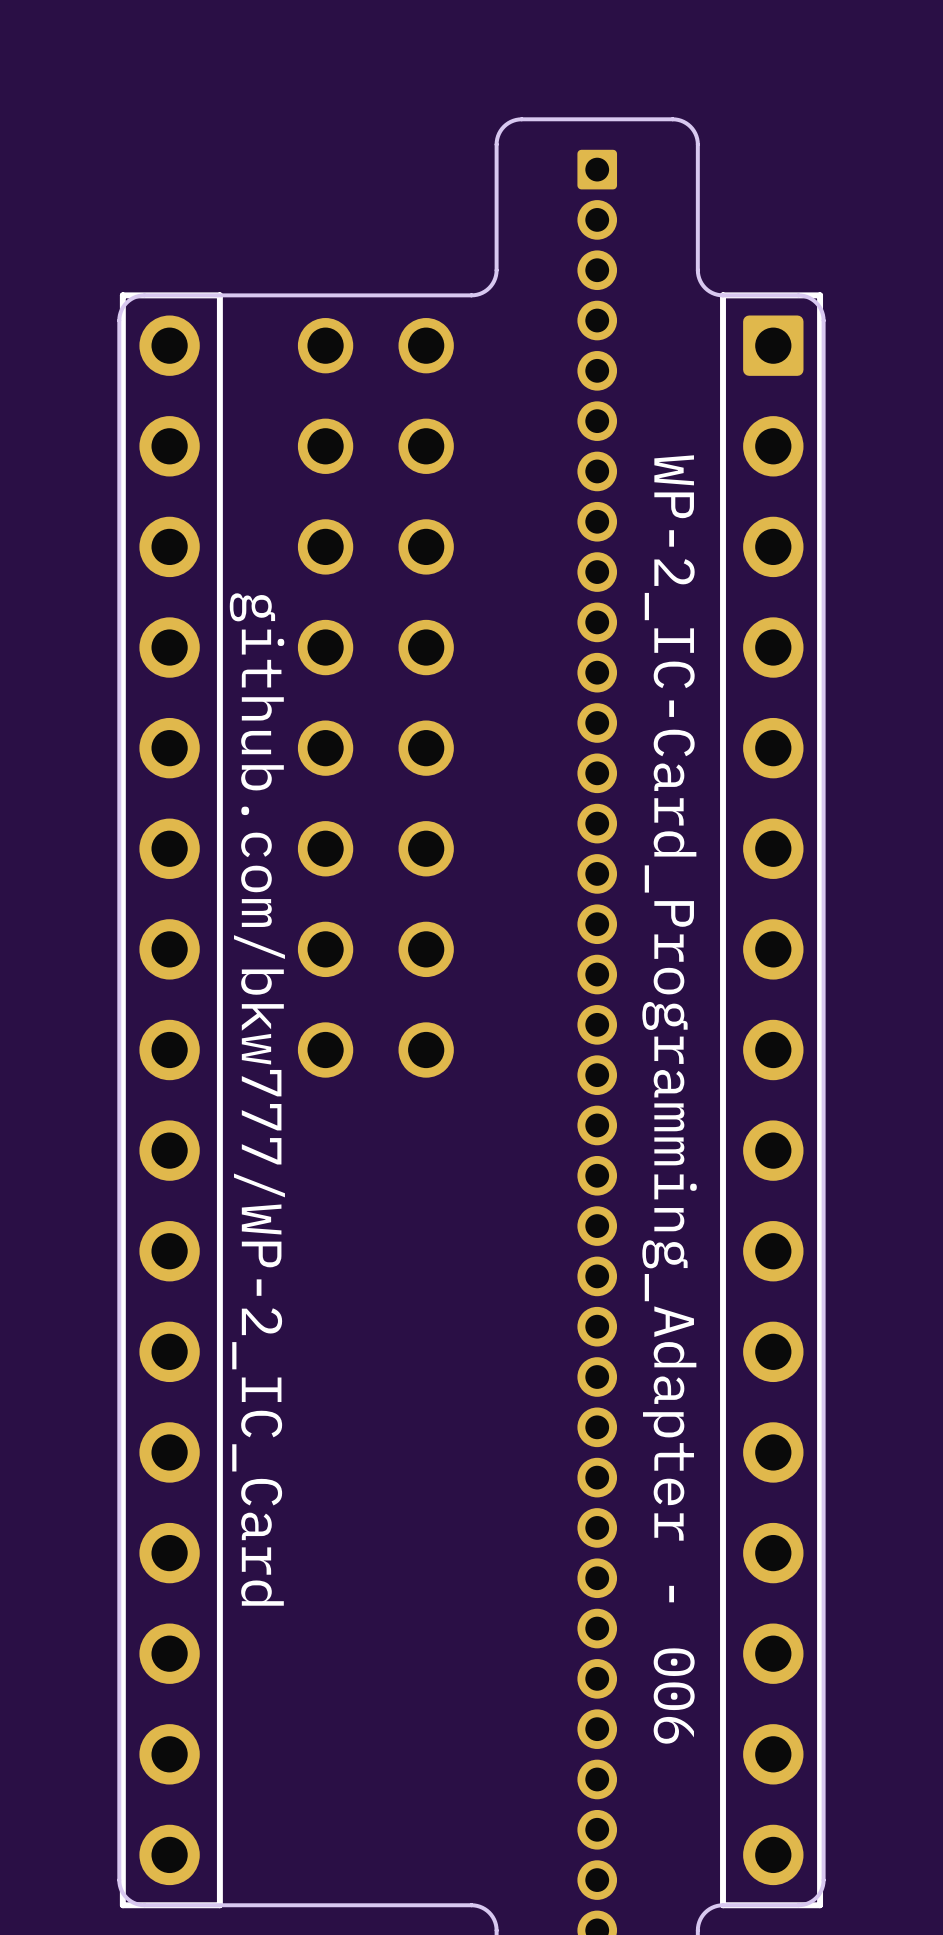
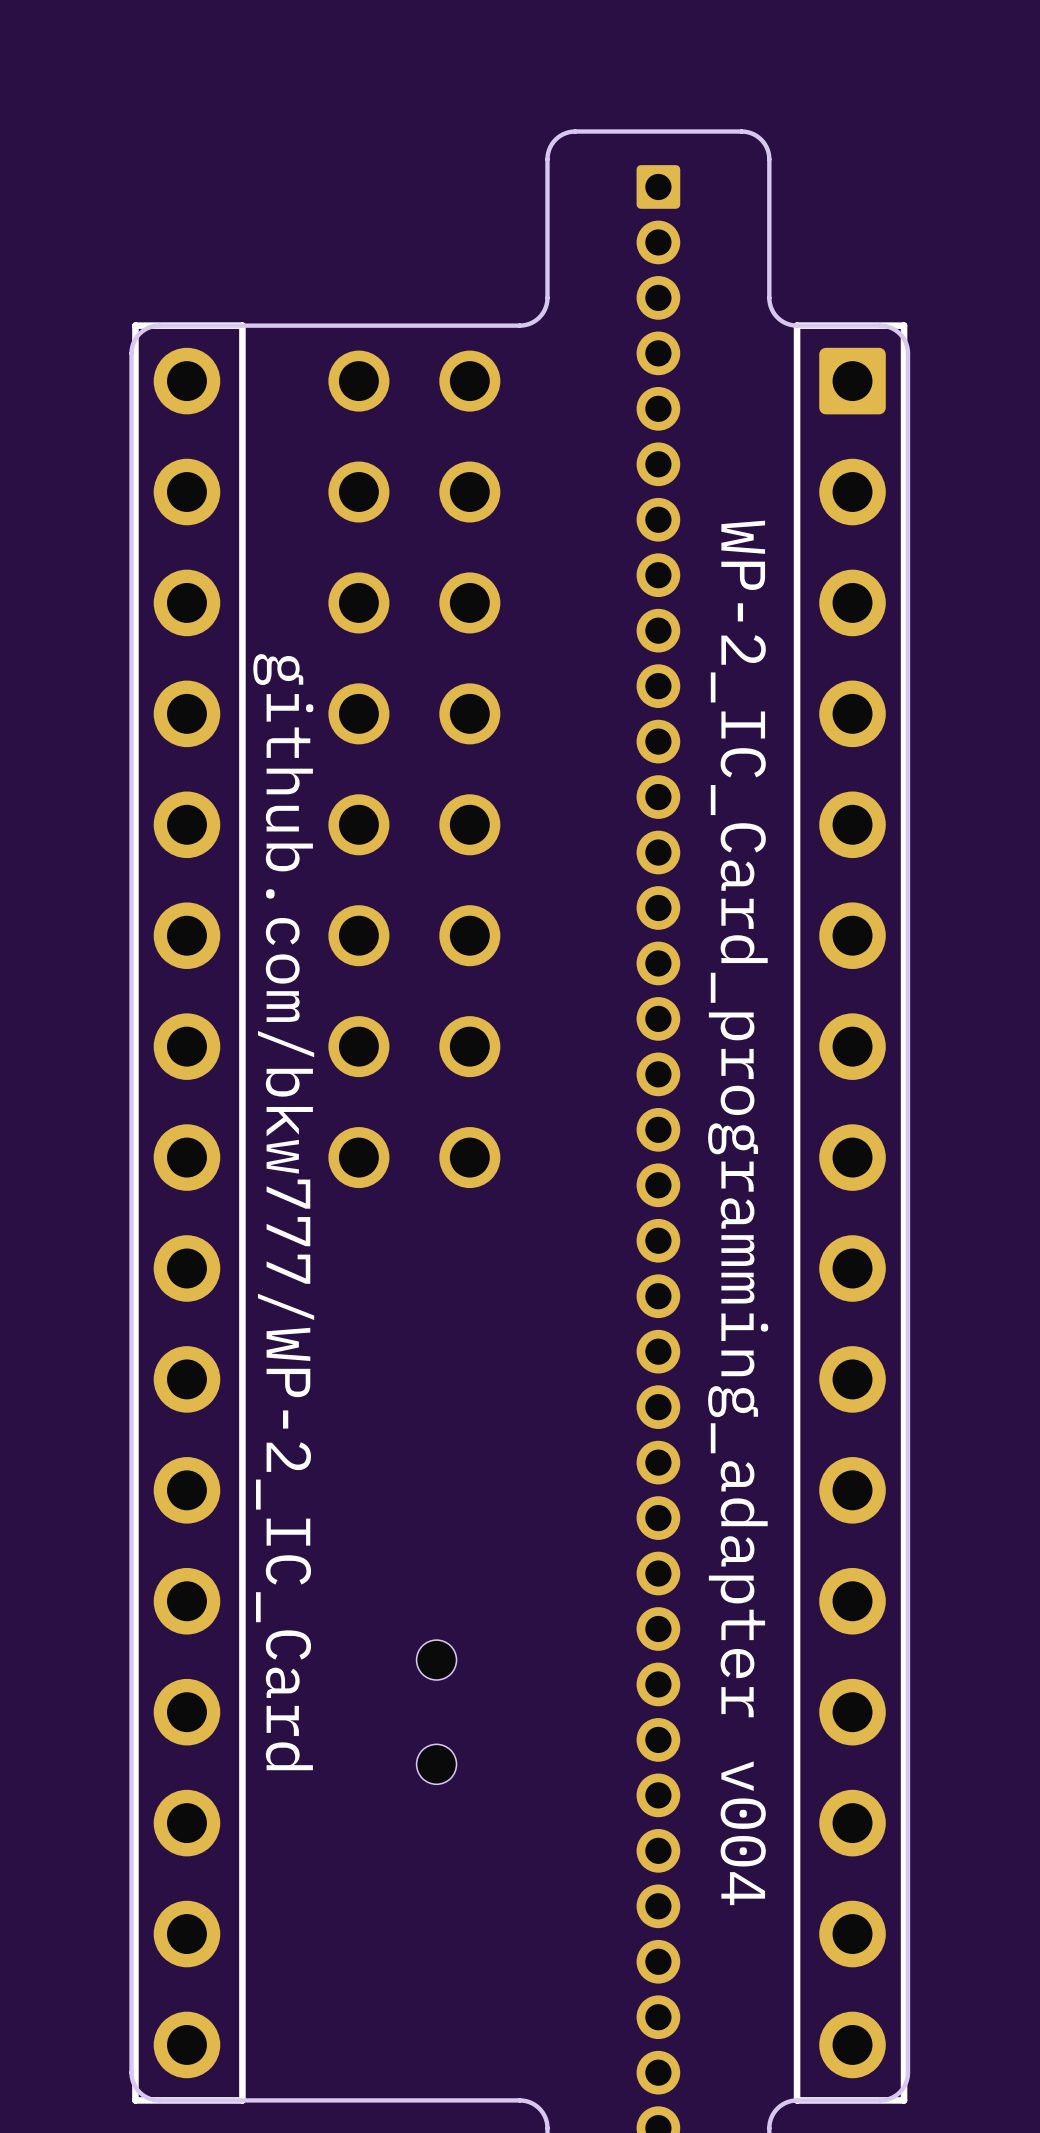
text: WP-2_IC-Card_Programming_Adapter - 006 (669, 1099) -> WP-2_IC_Card_programming_adapter v004 (738, 1212)
part: none -> (436, 1712)

